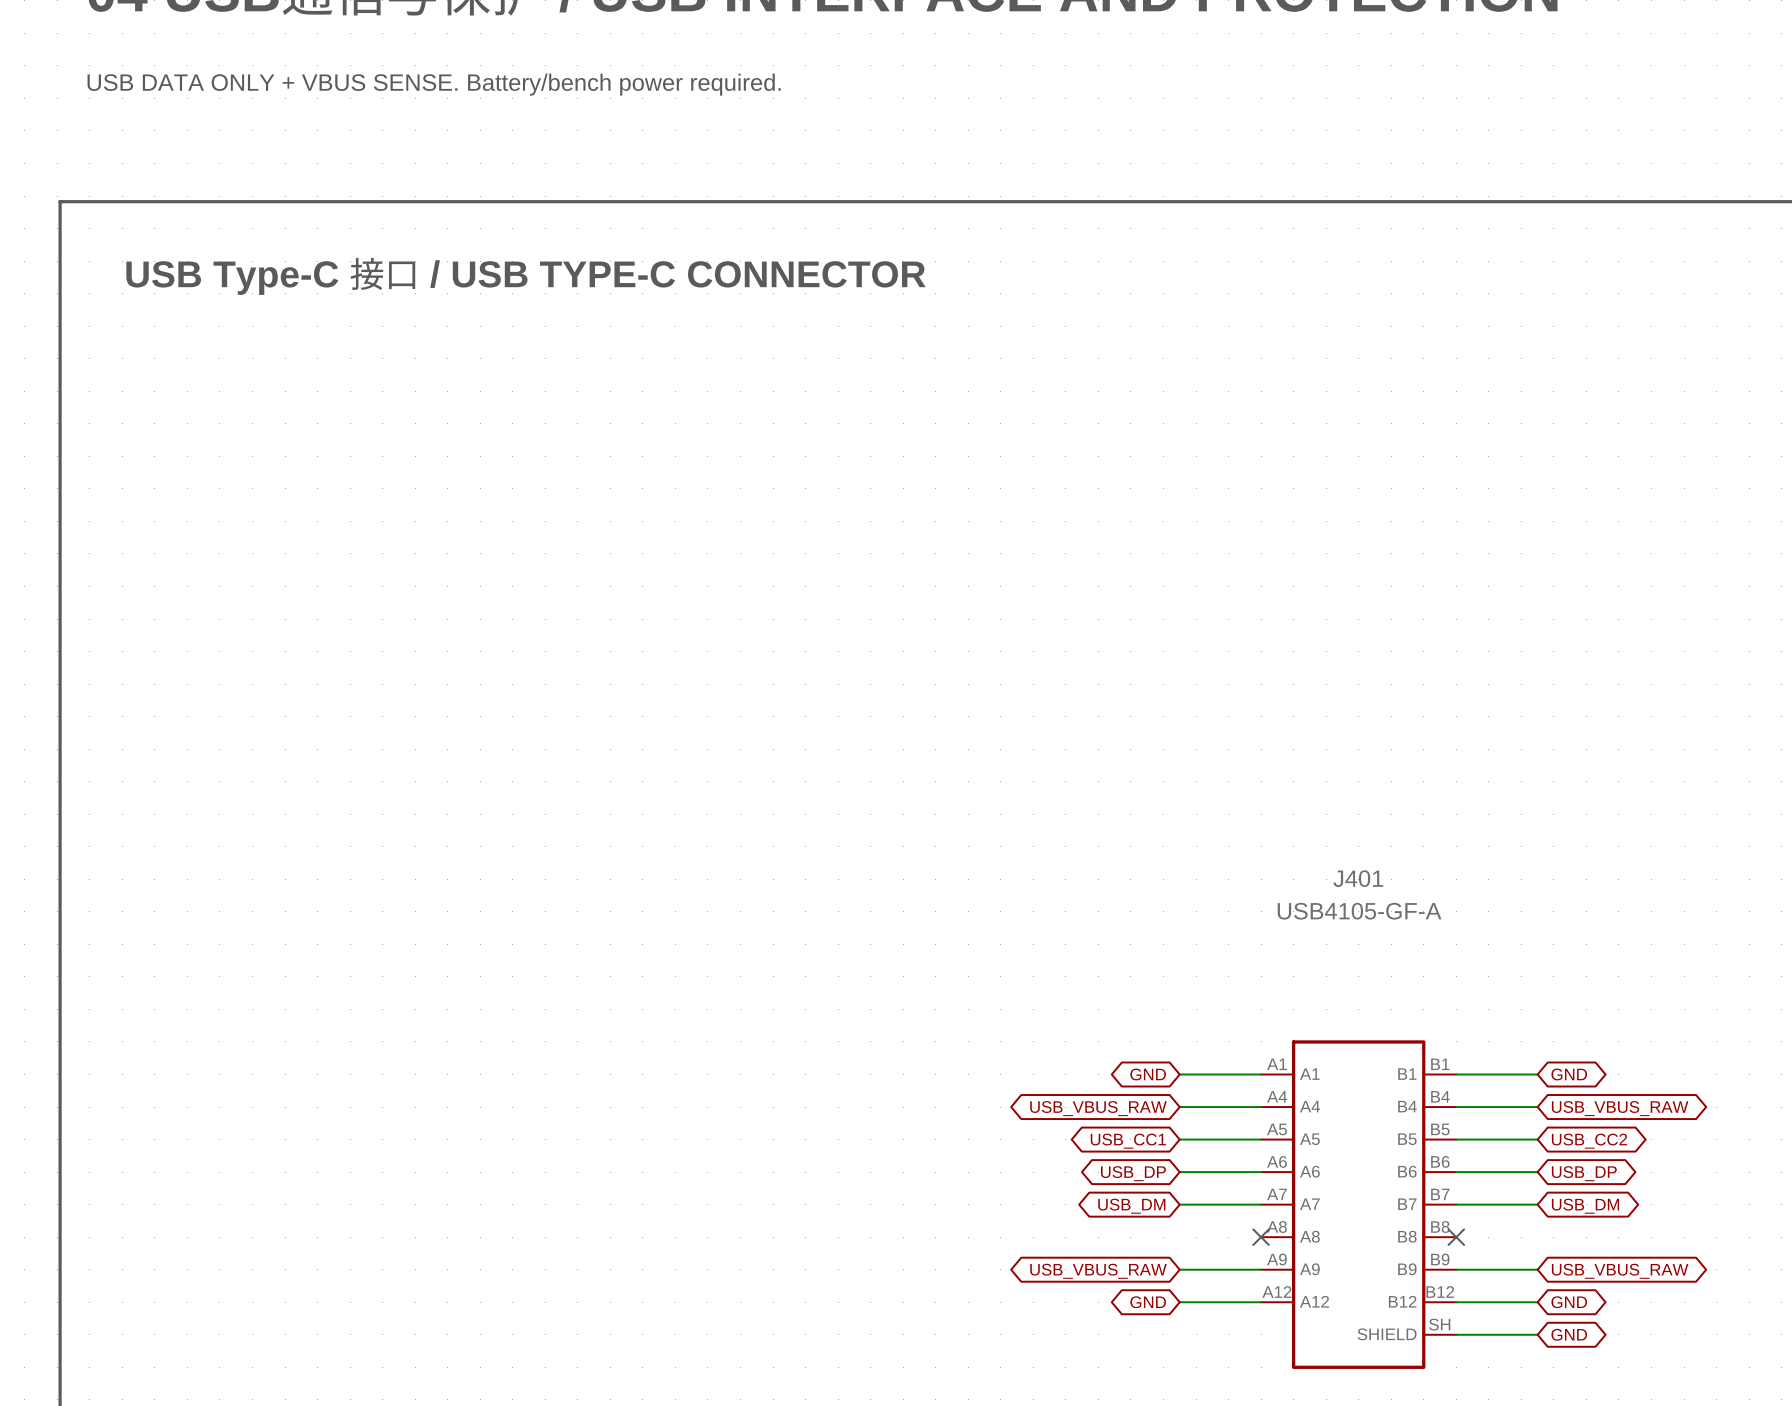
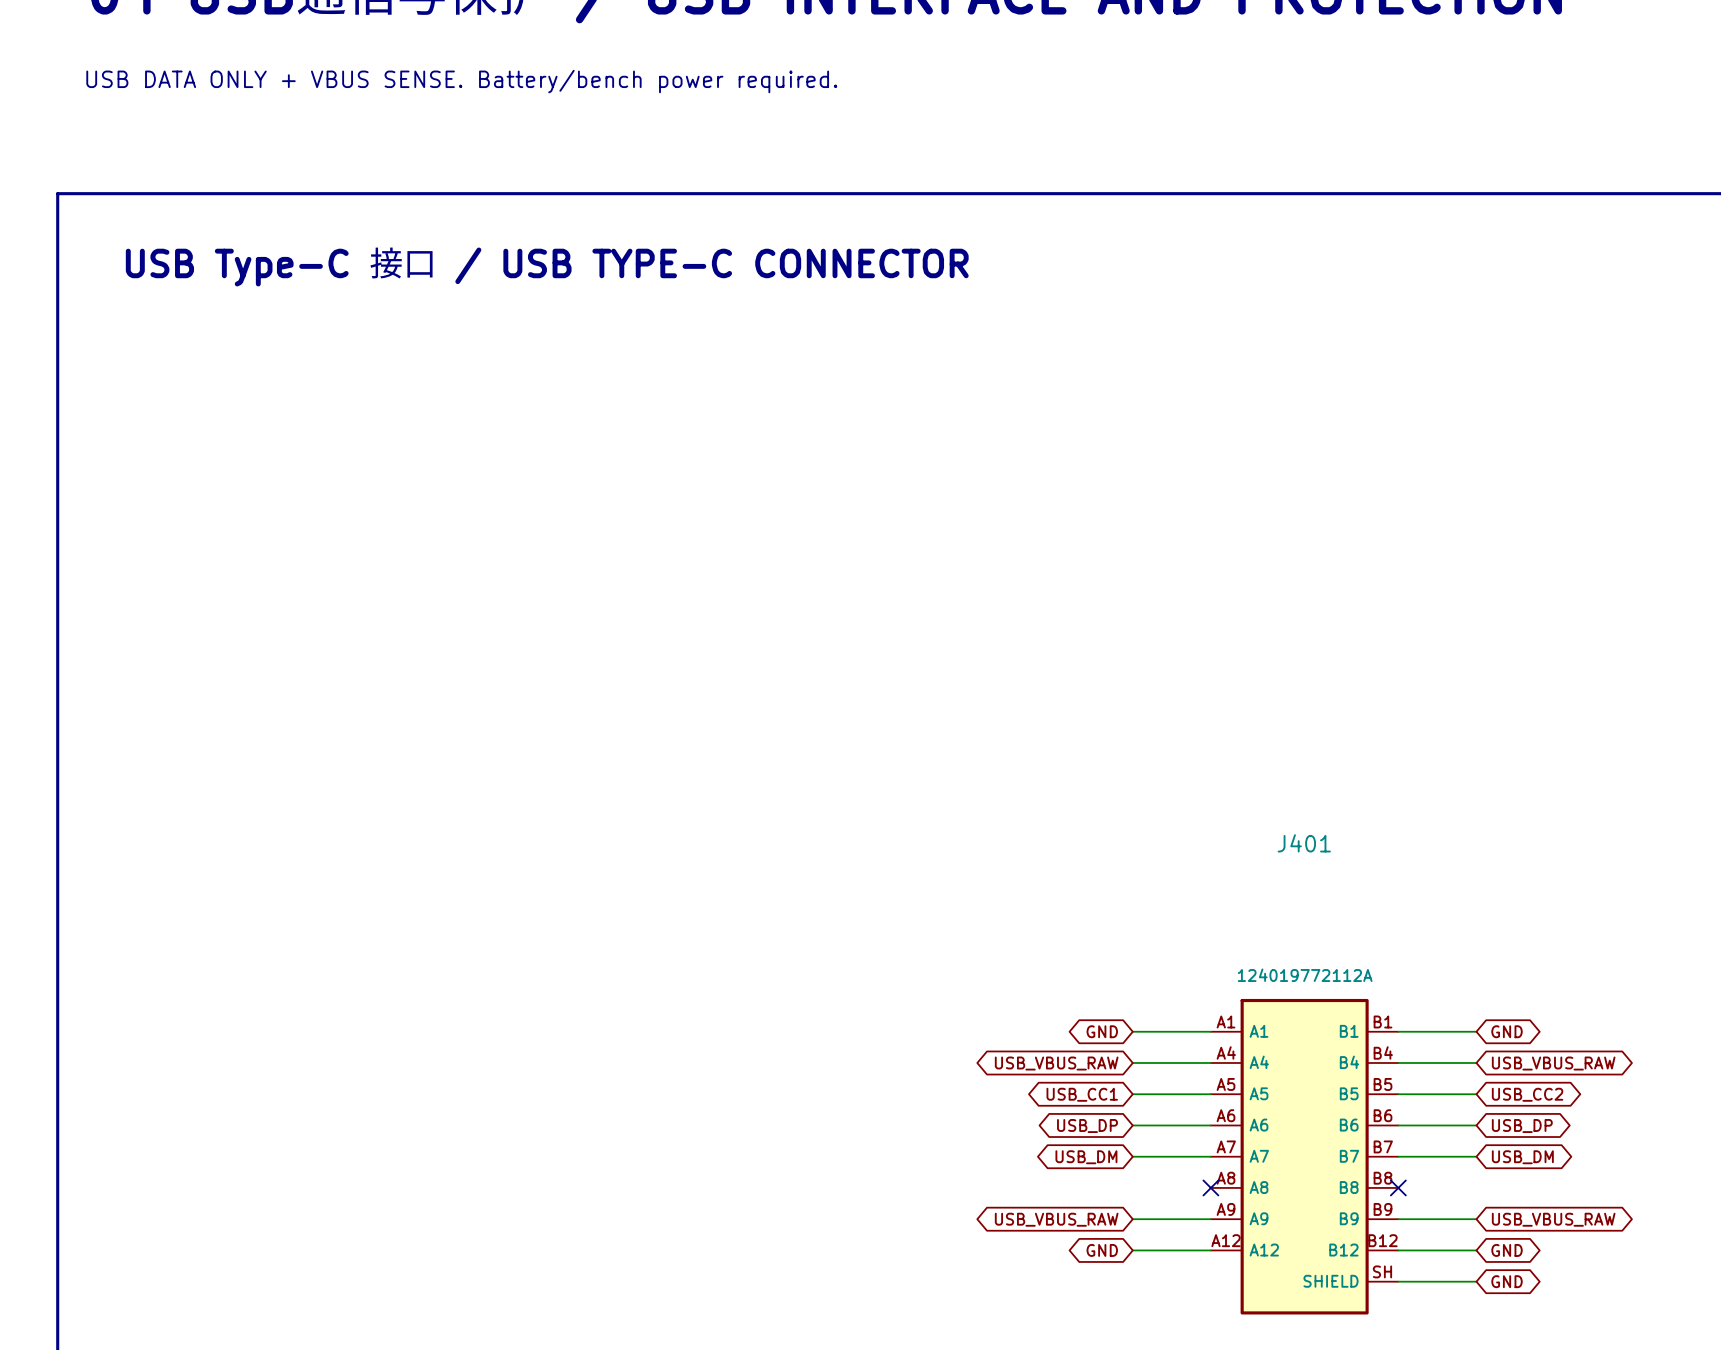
J401 value: USB4105-GF-A (1359, 911) -> 124019772112A (1305, 975)

